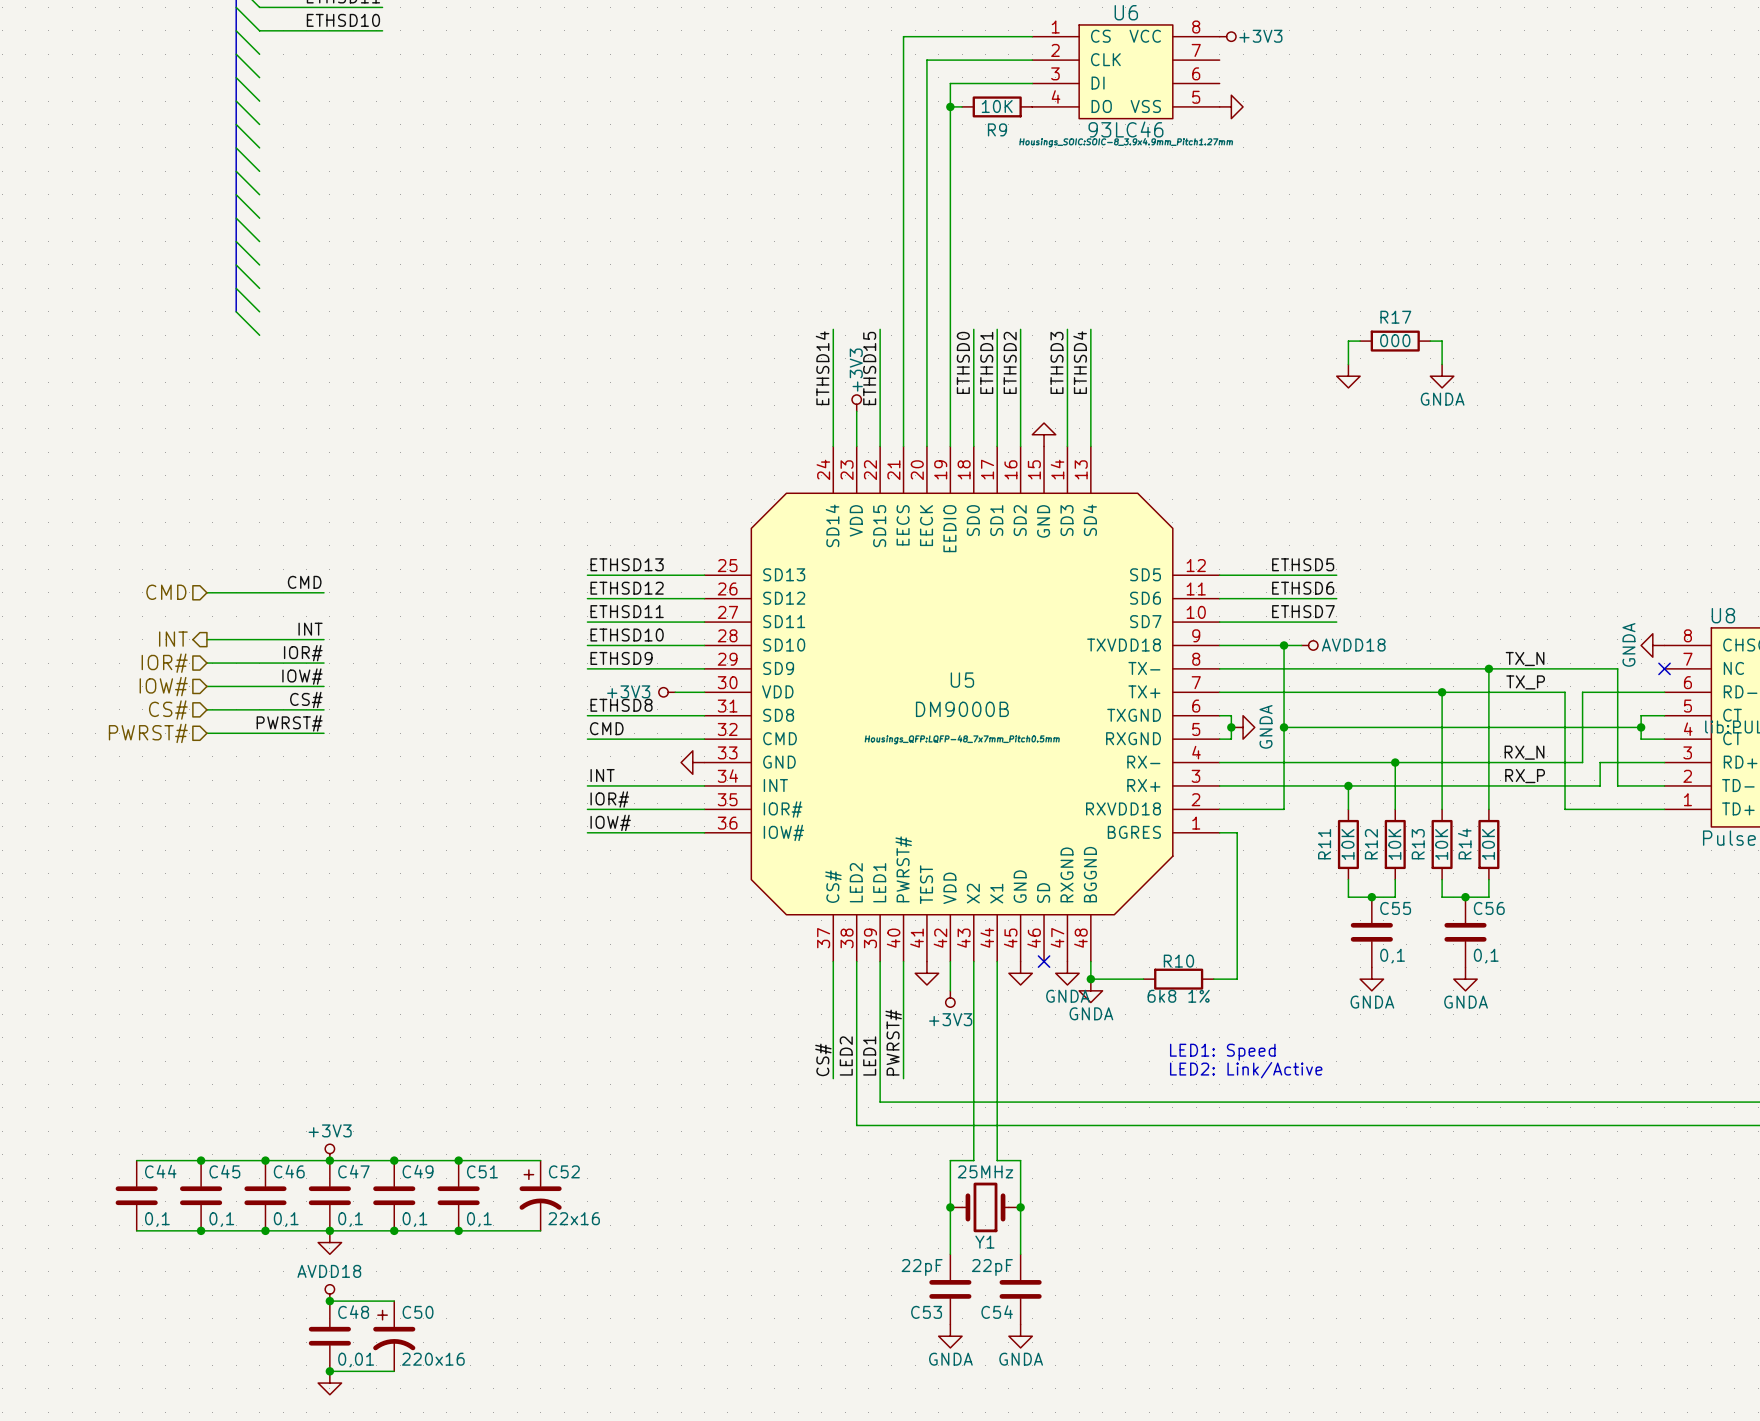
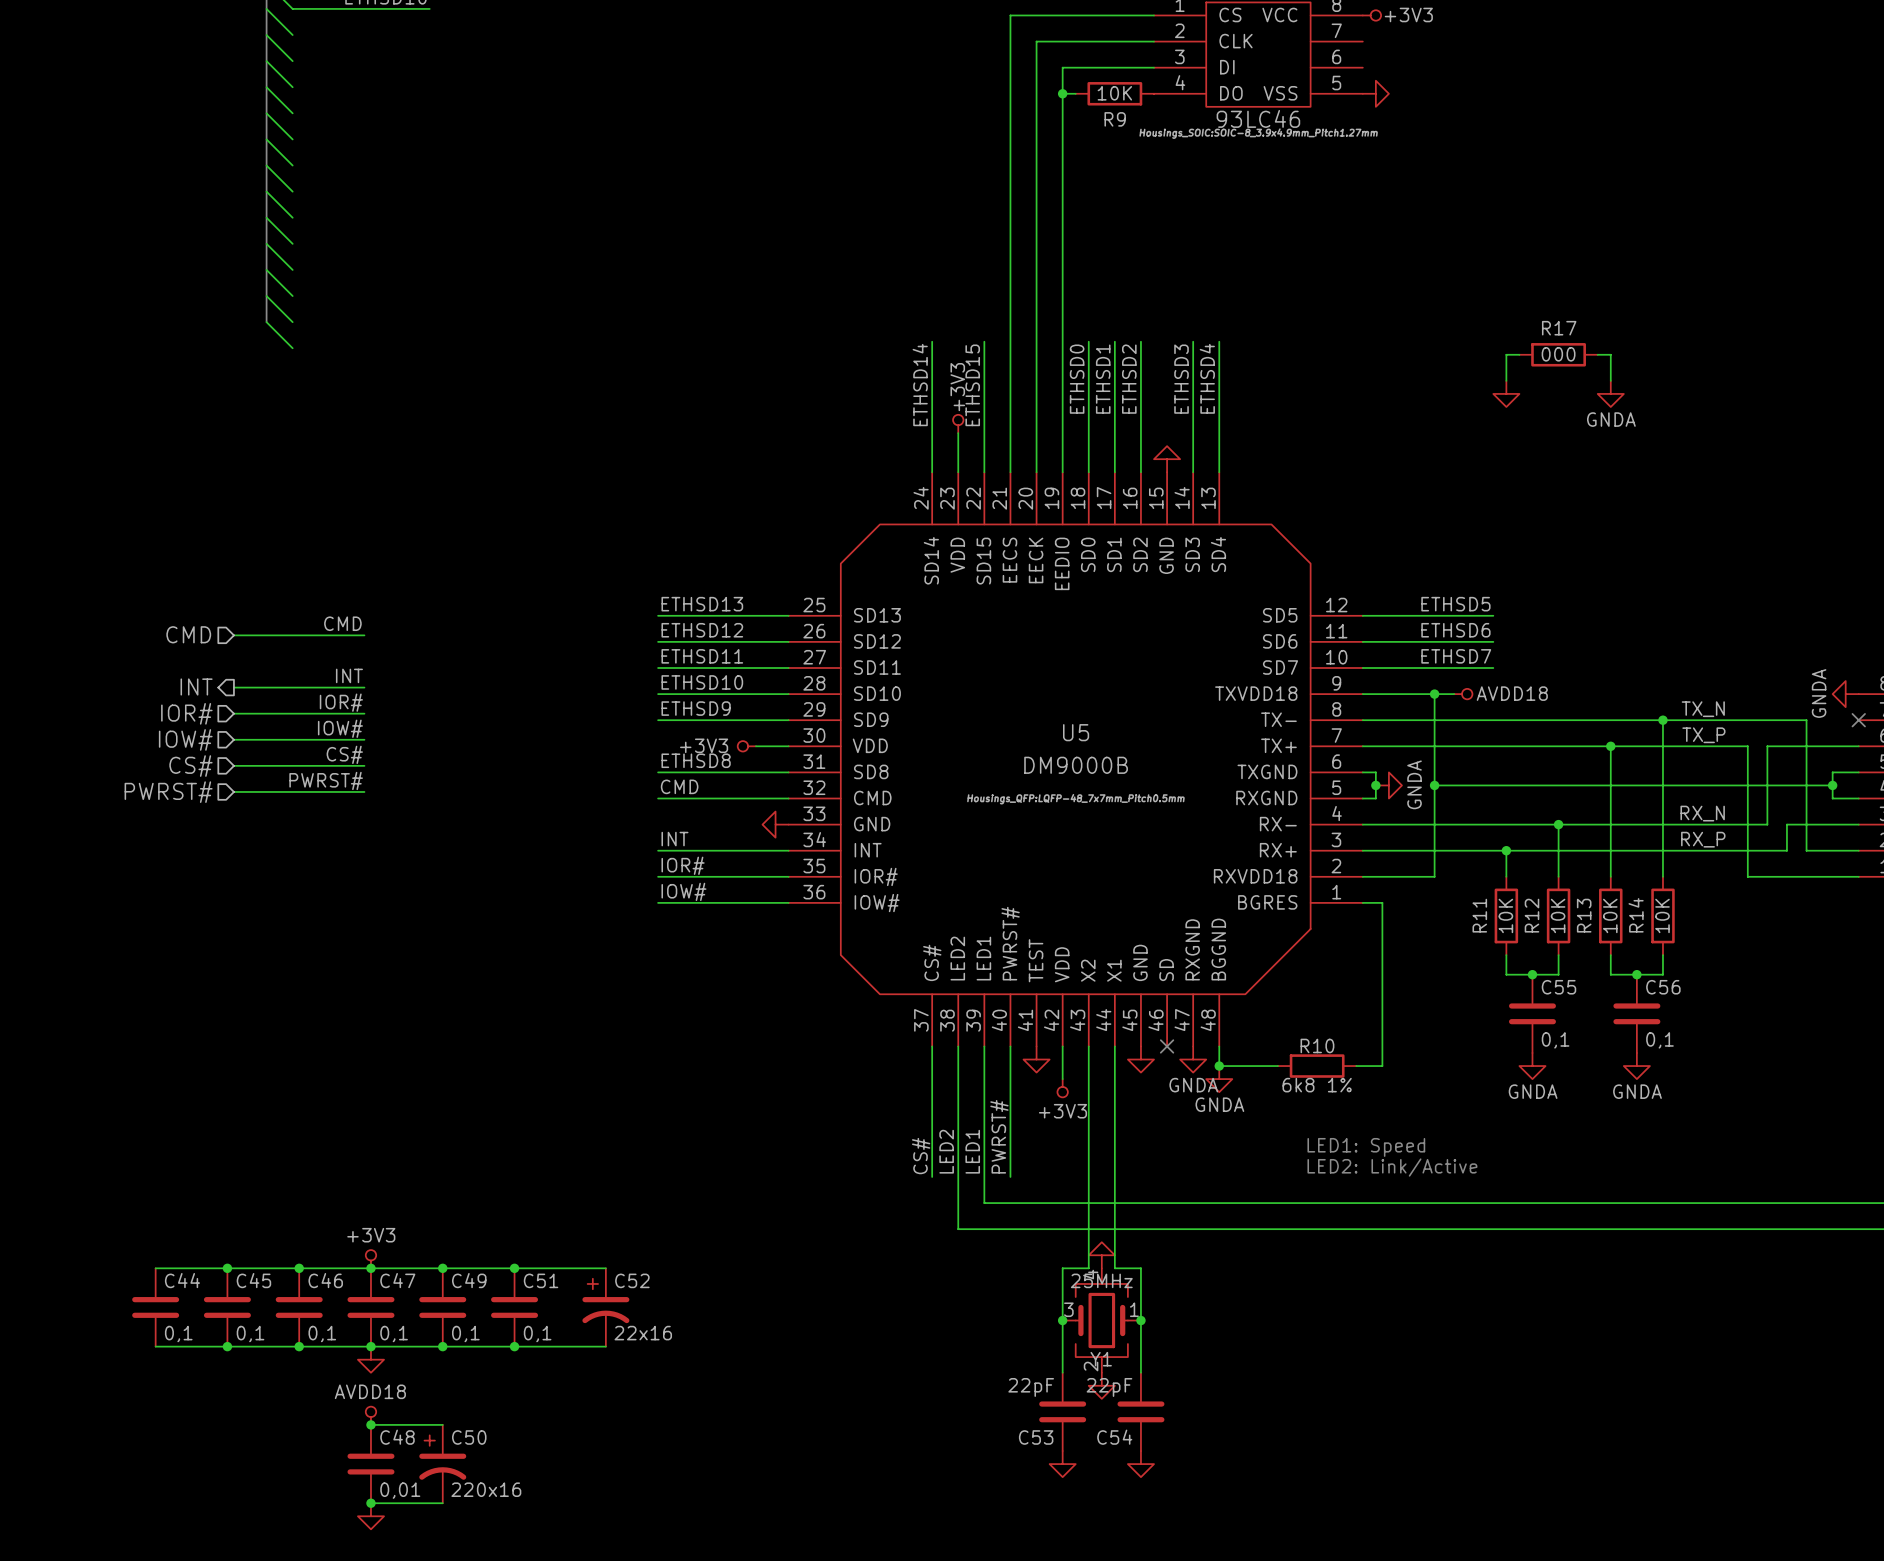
power symbol: none -> (1101, 1255)
Y1 symbol: [950, 1182, 1021, 1233] -> [1062, 1268, 1141, 1373]
power symbol: none -> (1101, 1385)
power symbol text: GNDA (950, 1359) -> none
power symbol text: GNDA (1021, 1359) -> none

